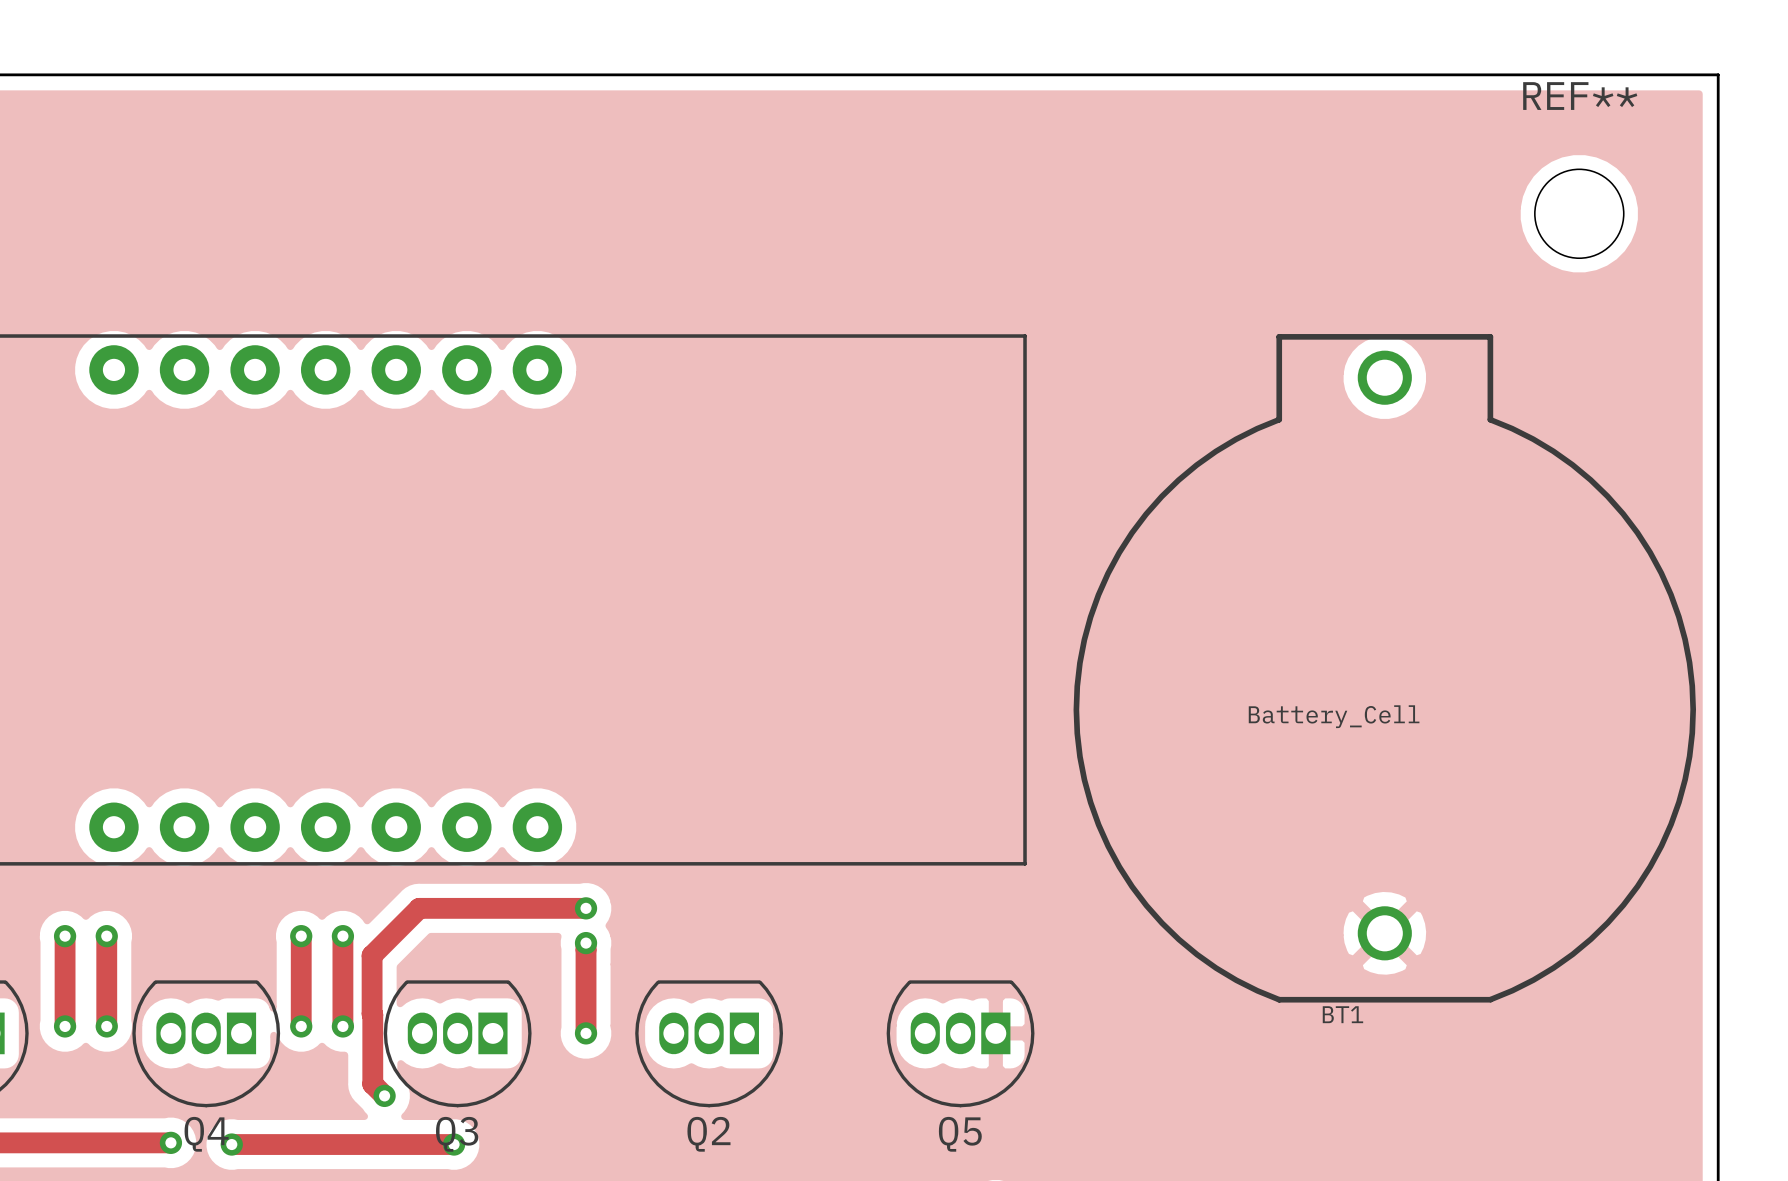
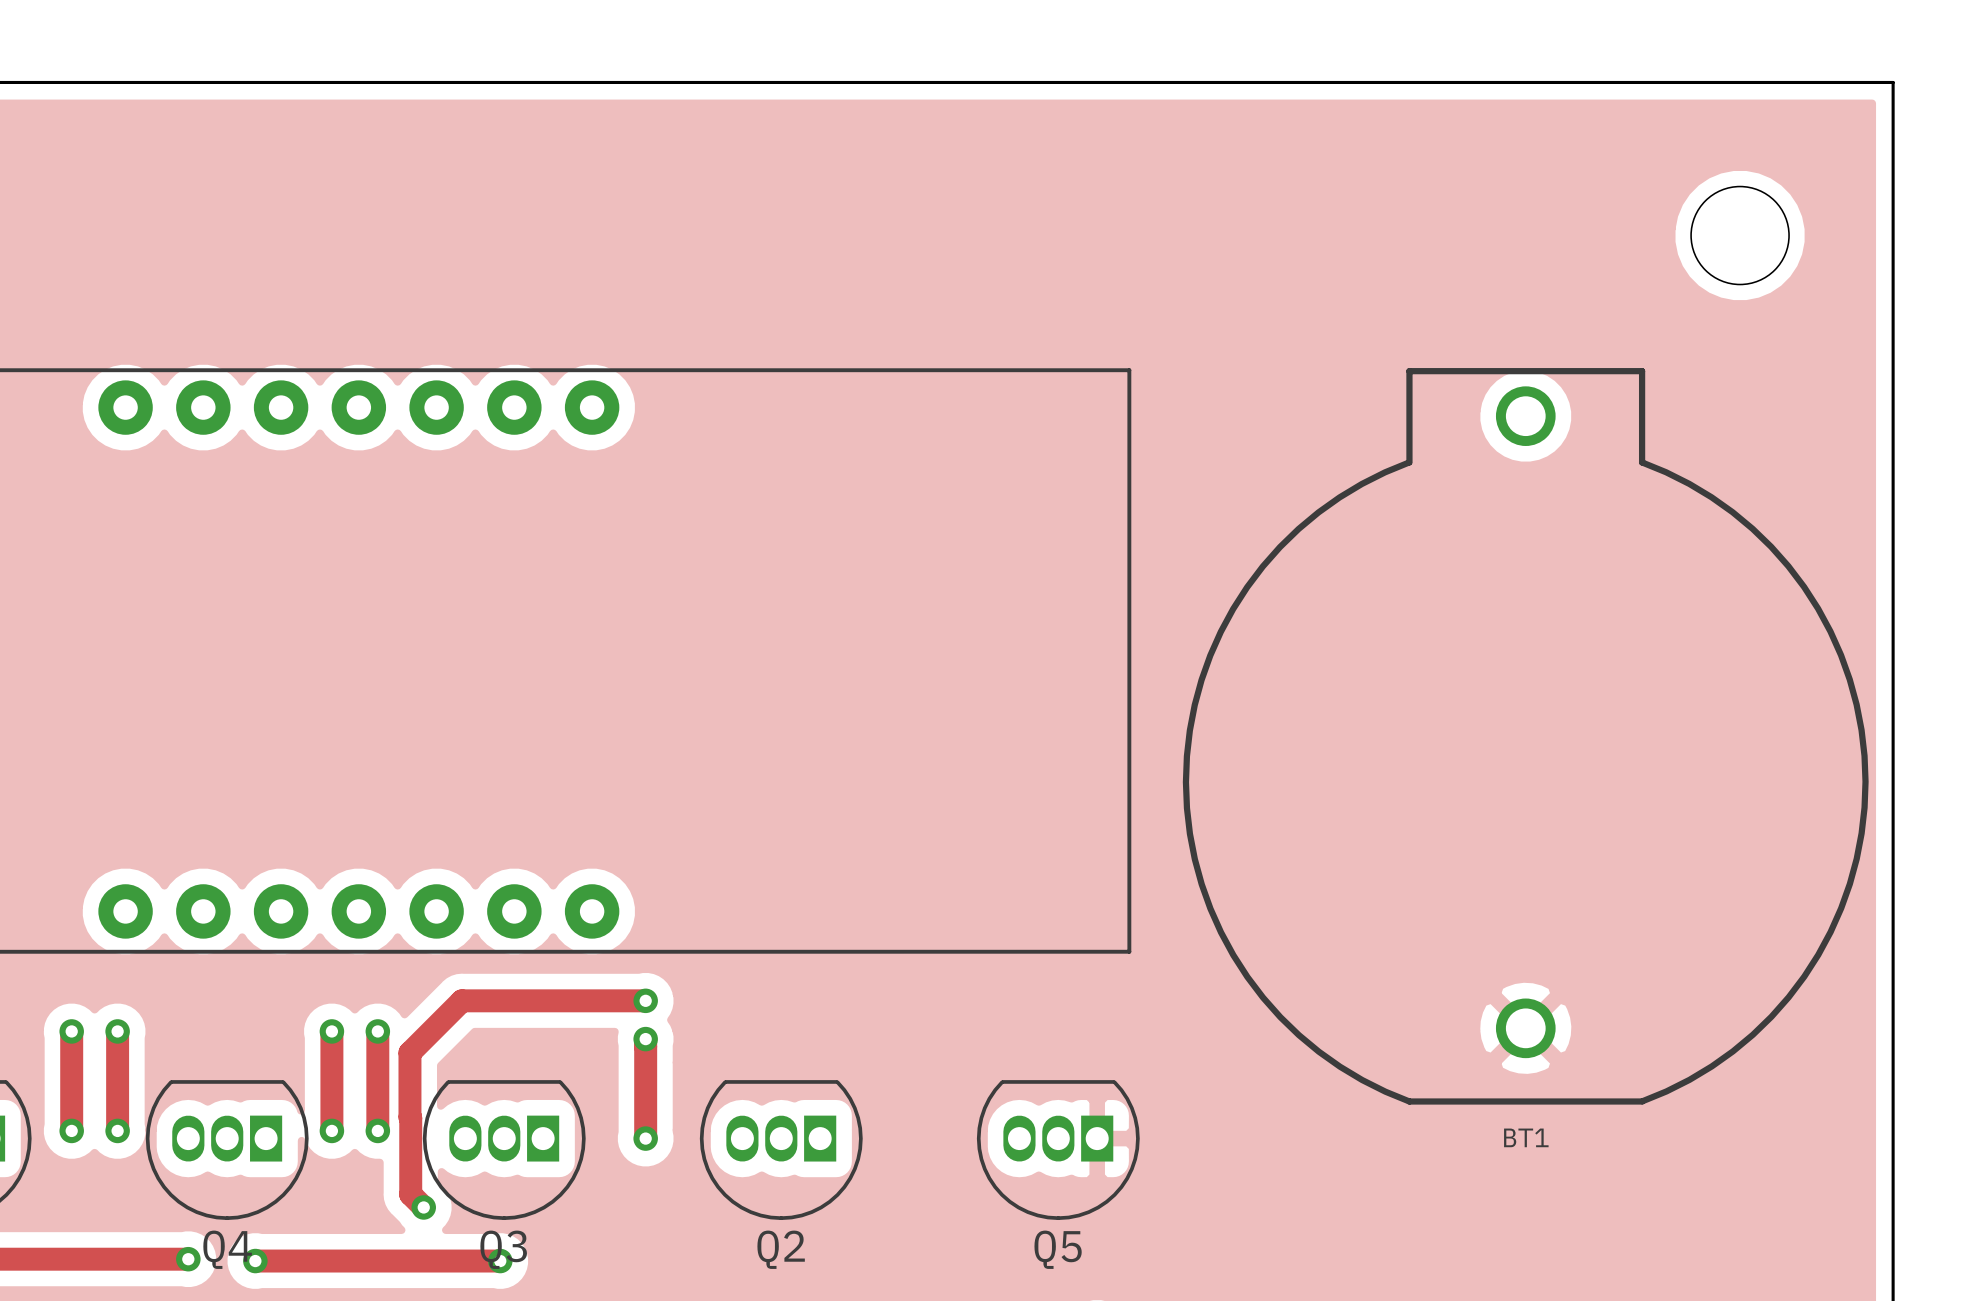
REF** name: REF** (1580, 96) -> none
BT1 value: Battery_Cell (1334, 716) -> none
BT1 name position: BT1 (1342, 1014) -> BT1 (1526, 1137)

